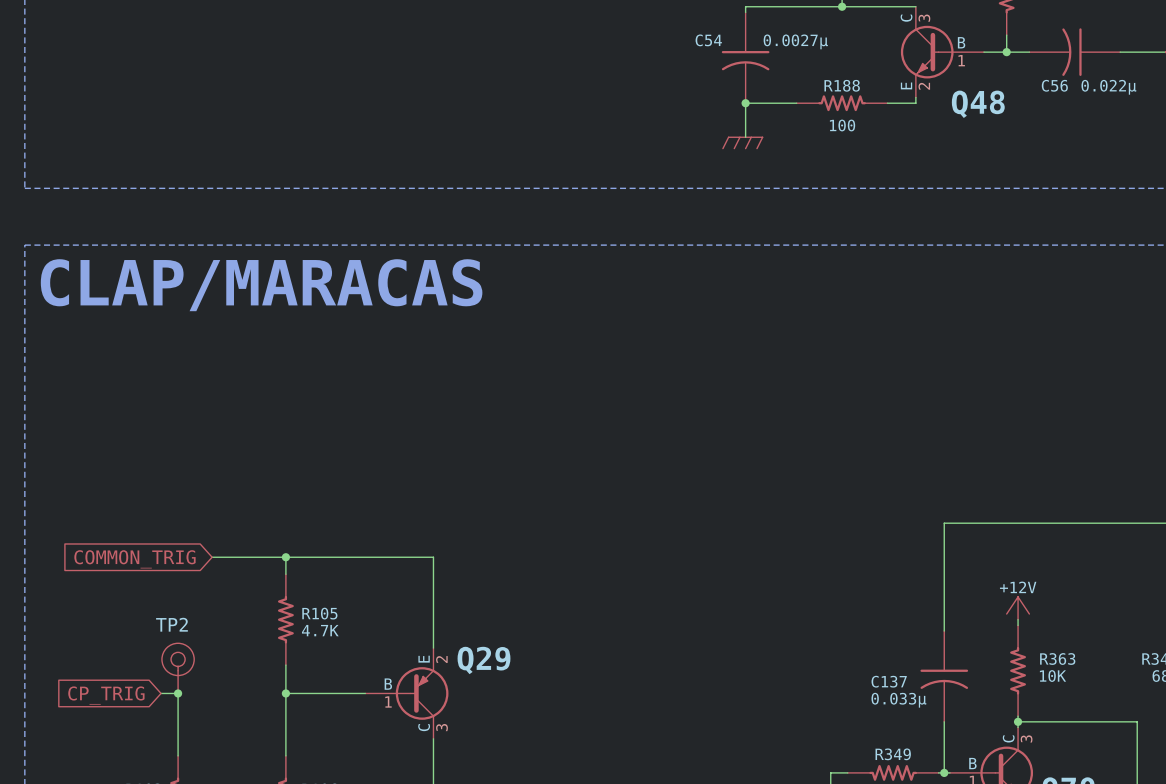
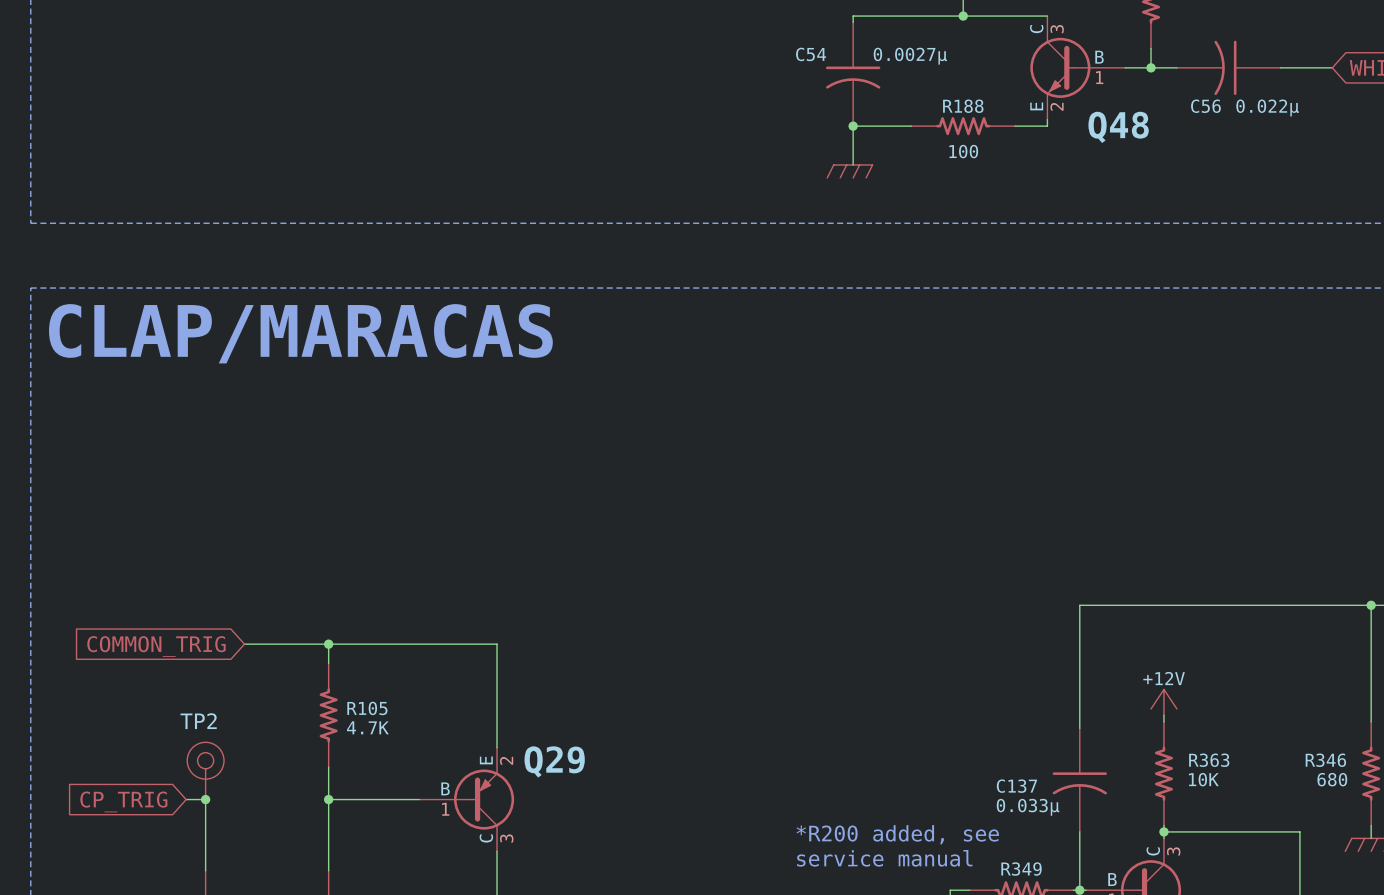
text: none -> *R200 added, see (897, 834)
text: none -> service manual (884, 858)

